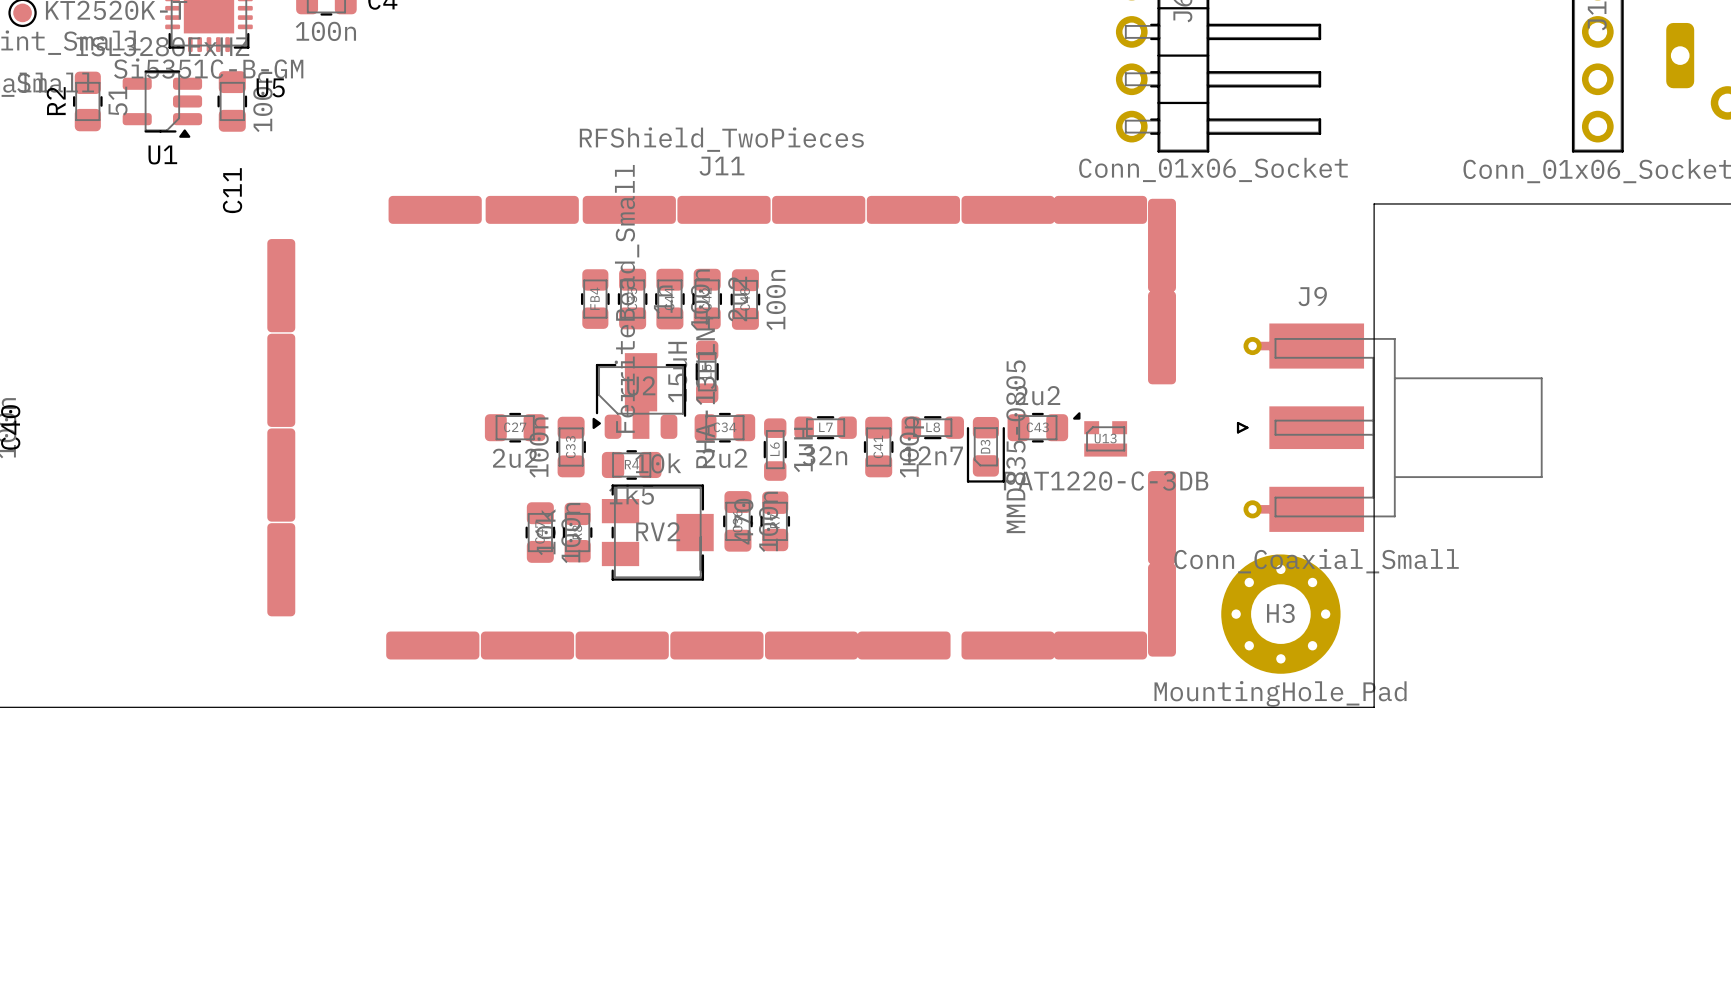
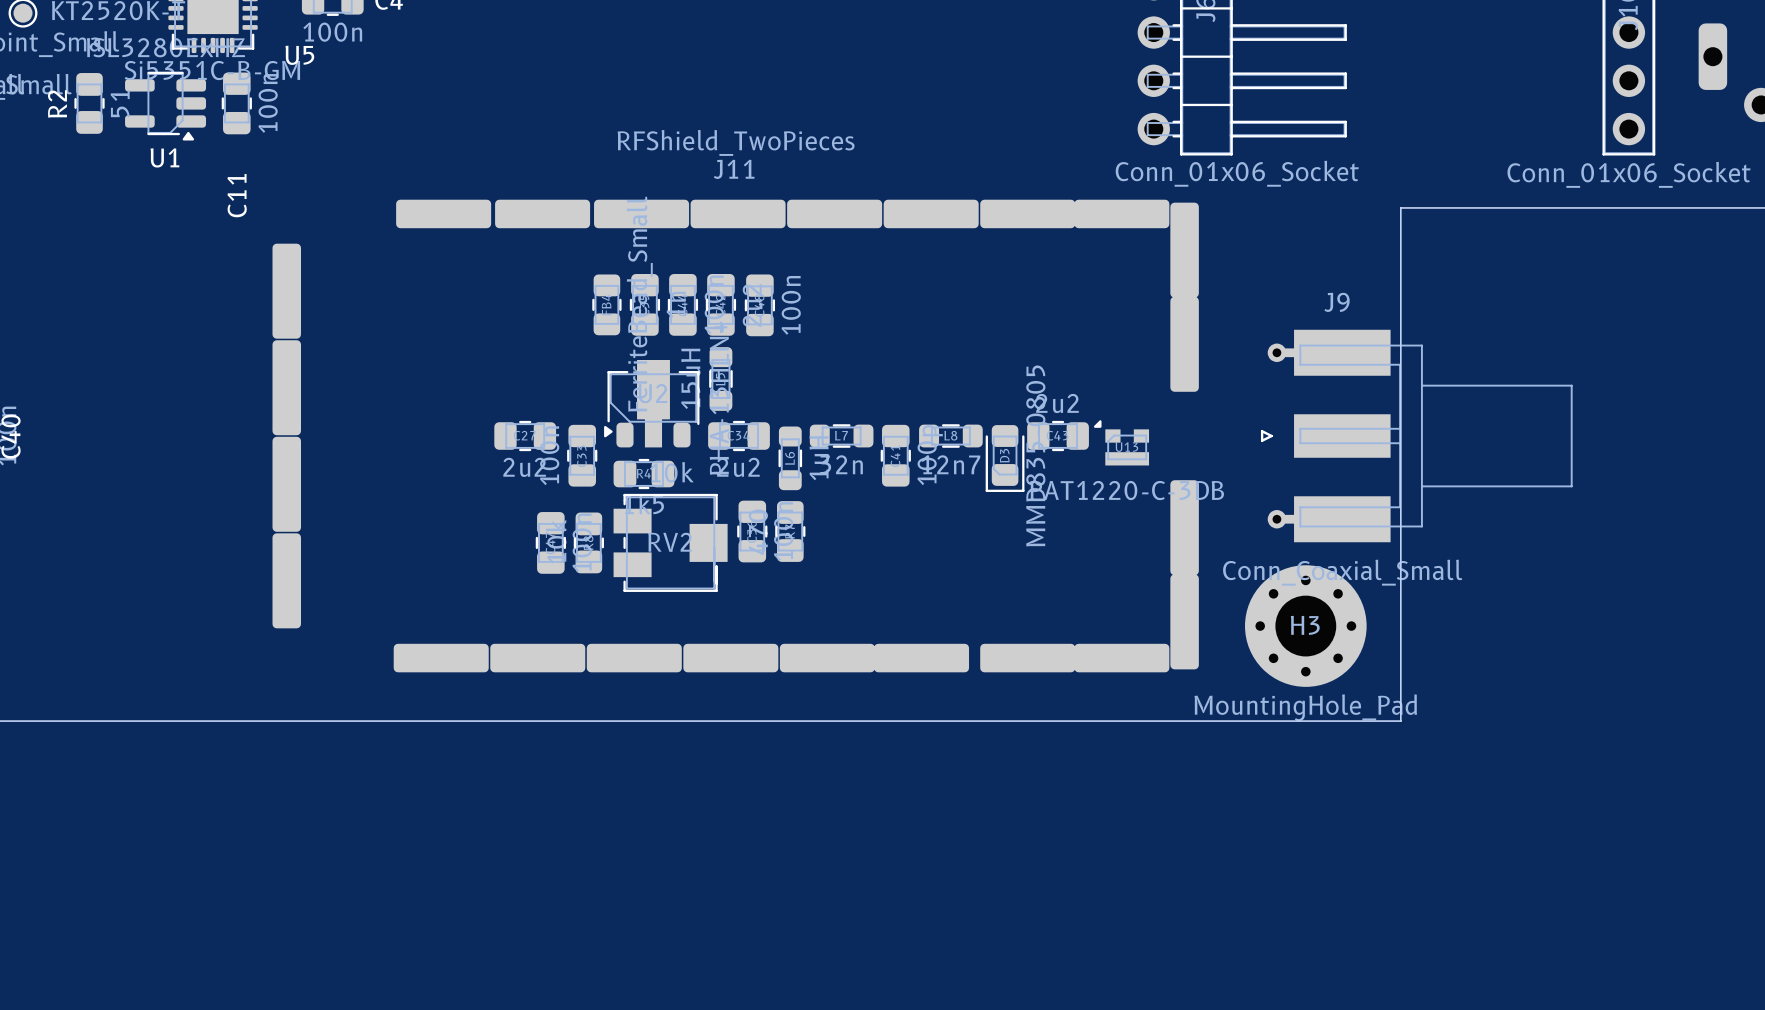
U5 name position: U5 (270, 87) -> U5 (299, 55)

